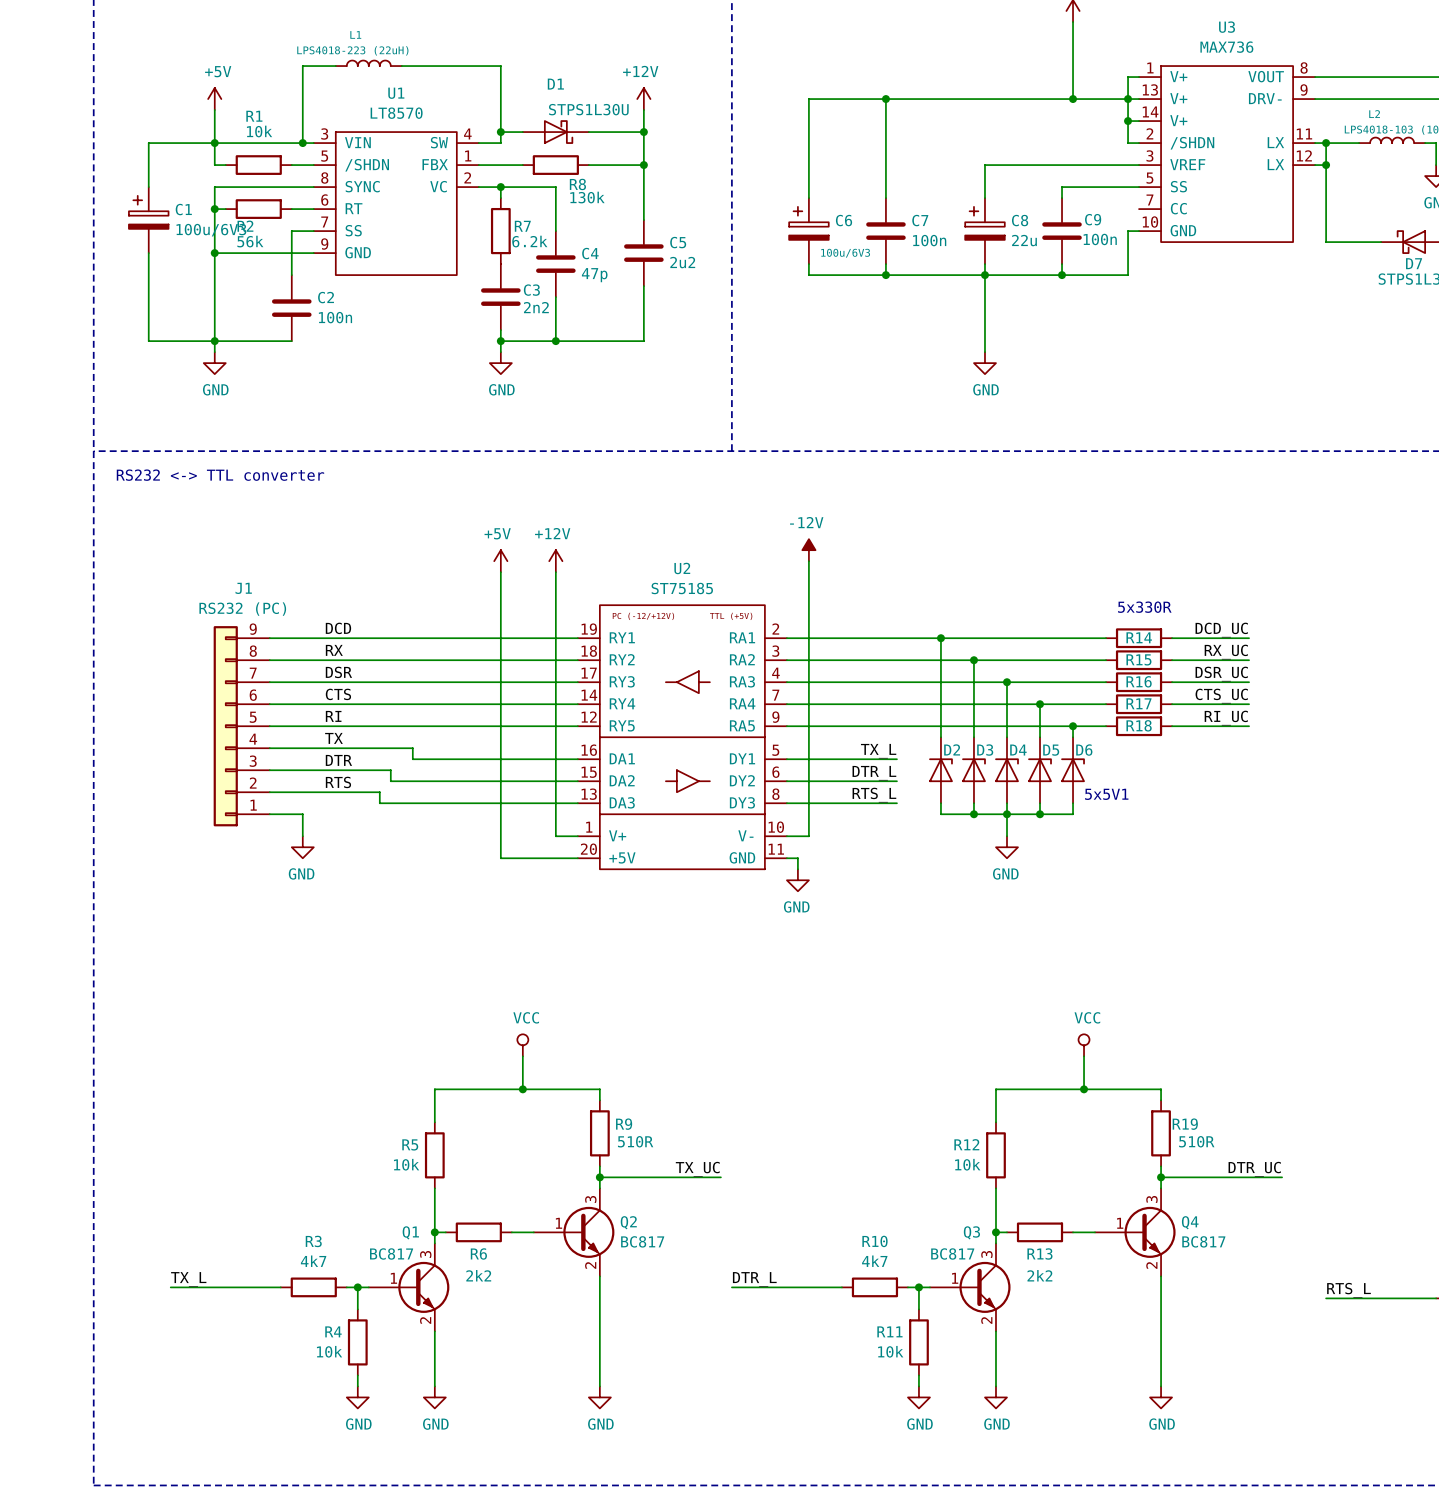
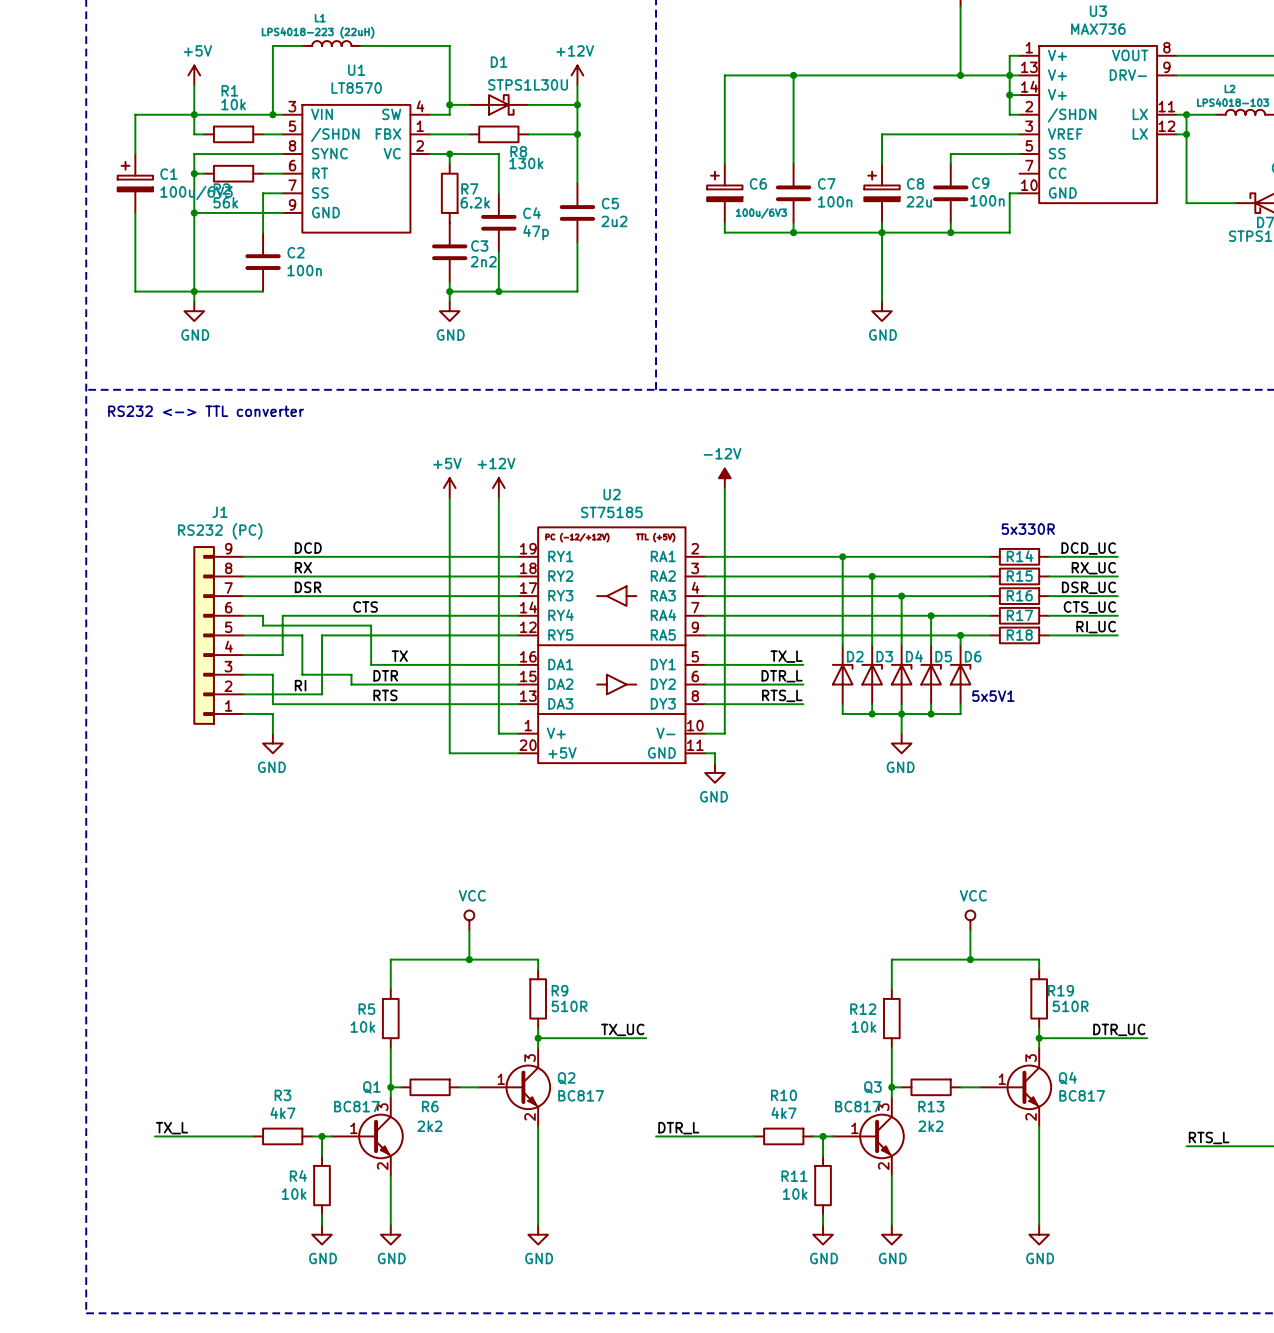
label position: CTS (338, 694) -> CTS (365, 607)
wire: (291, 704) (313, 704) -> (282, 655) (282, 615)
label: RI (333, 716) -> none
wire: (335, 726) (357, 726) -> (302, 635) (302, 674)
label position: TX (333, 738) -> TX (399, 656)
wire: (313, 748) (412, 748) -> (263, 615) (263, 625) (371, 625) (371, 655)
label position: DTR (338, 760) -> DTR (385, 675)
wire: (302, 770) (335, 770) -> (272, 674) (272, 704) (341, 704)
label: RTS (338, 782) -> RI (300, 685)
wire: (357, 792) (379, 792) (379, 803) -> (322, 694) (322, 635)
label: none -> RTS (385, 695)

